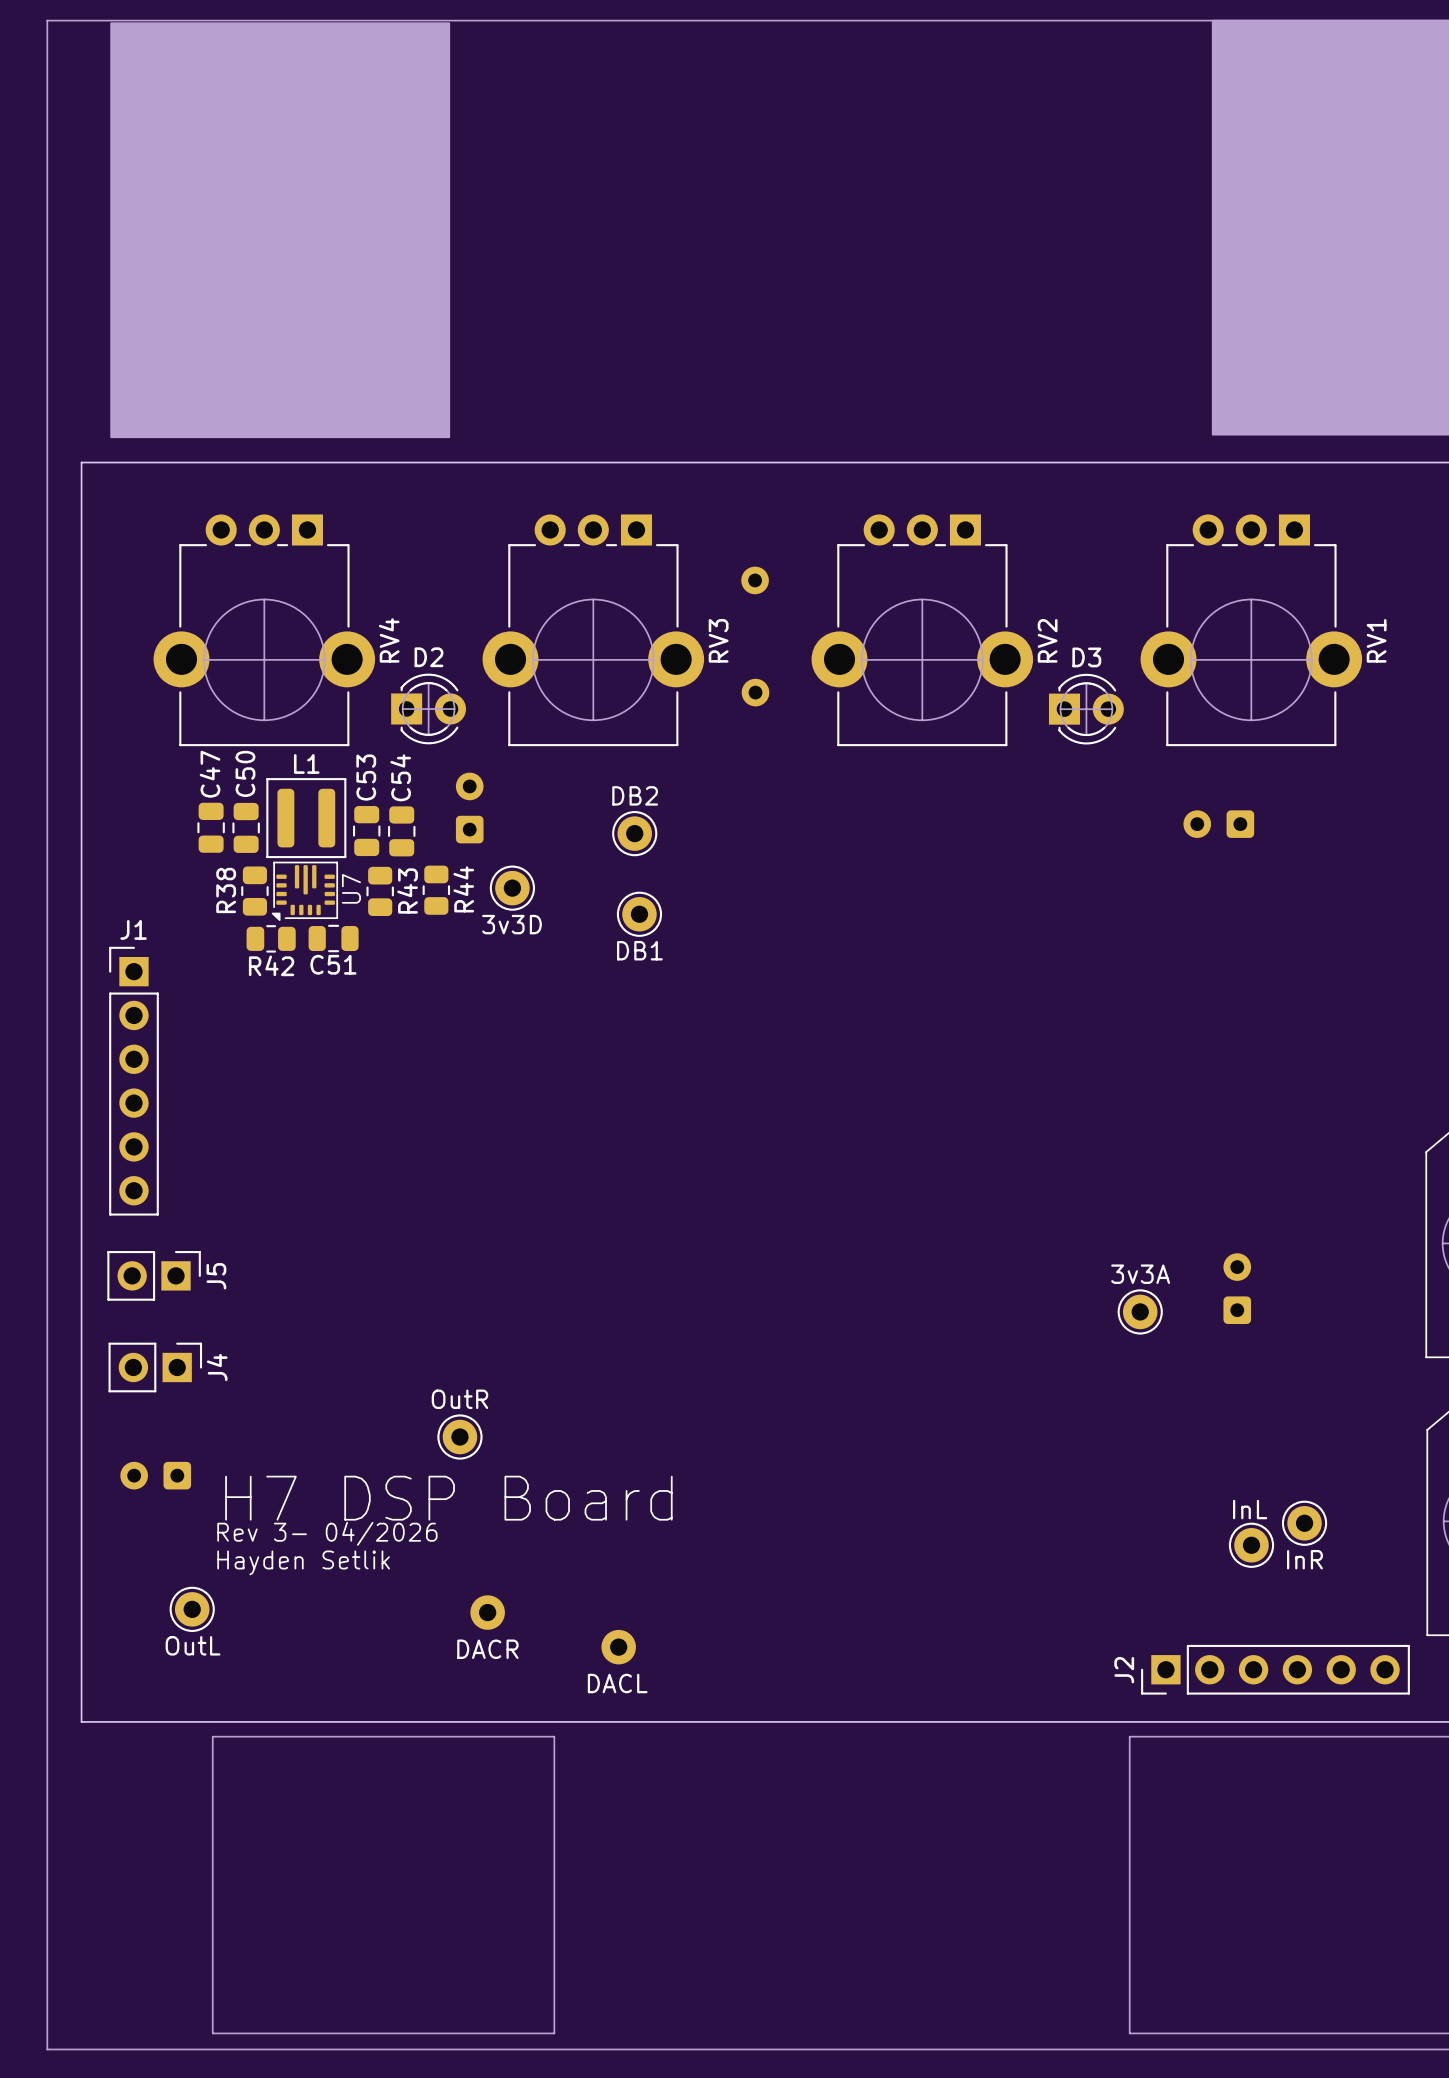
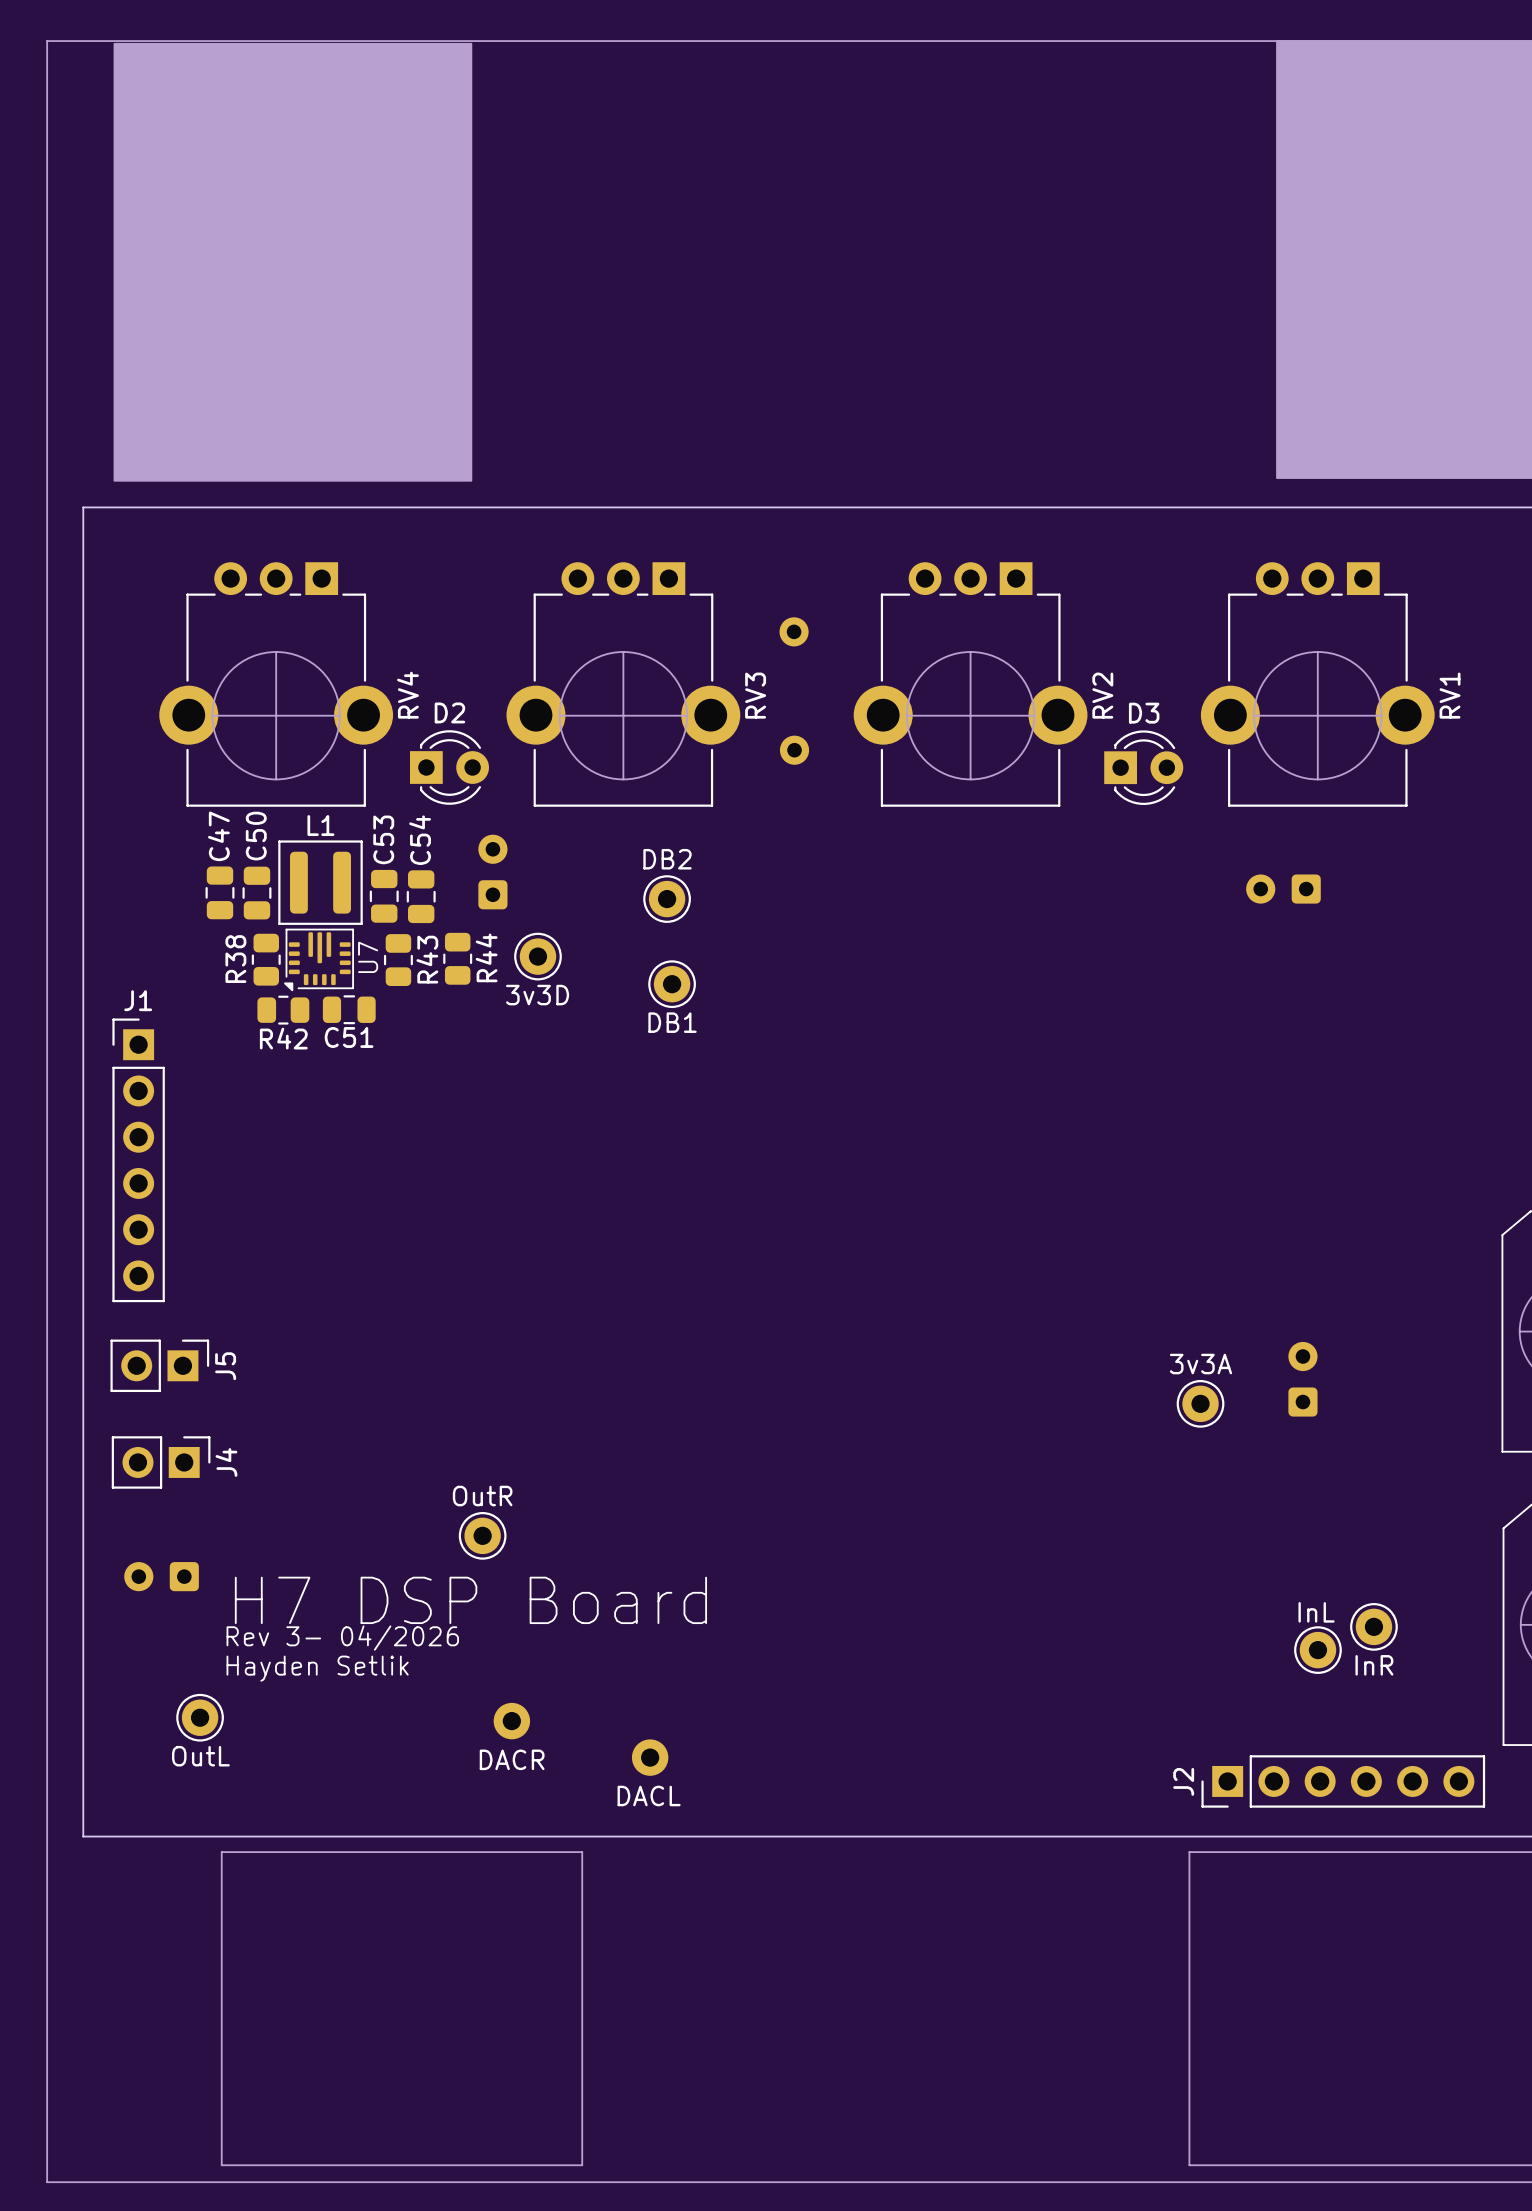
D2 footprint: [391, 673, 467, 745] -> [409, 730, 490, 805]
D3 footprint: [1048, 673, 1124, 745] -> [1104, 730, 1184, 805]

